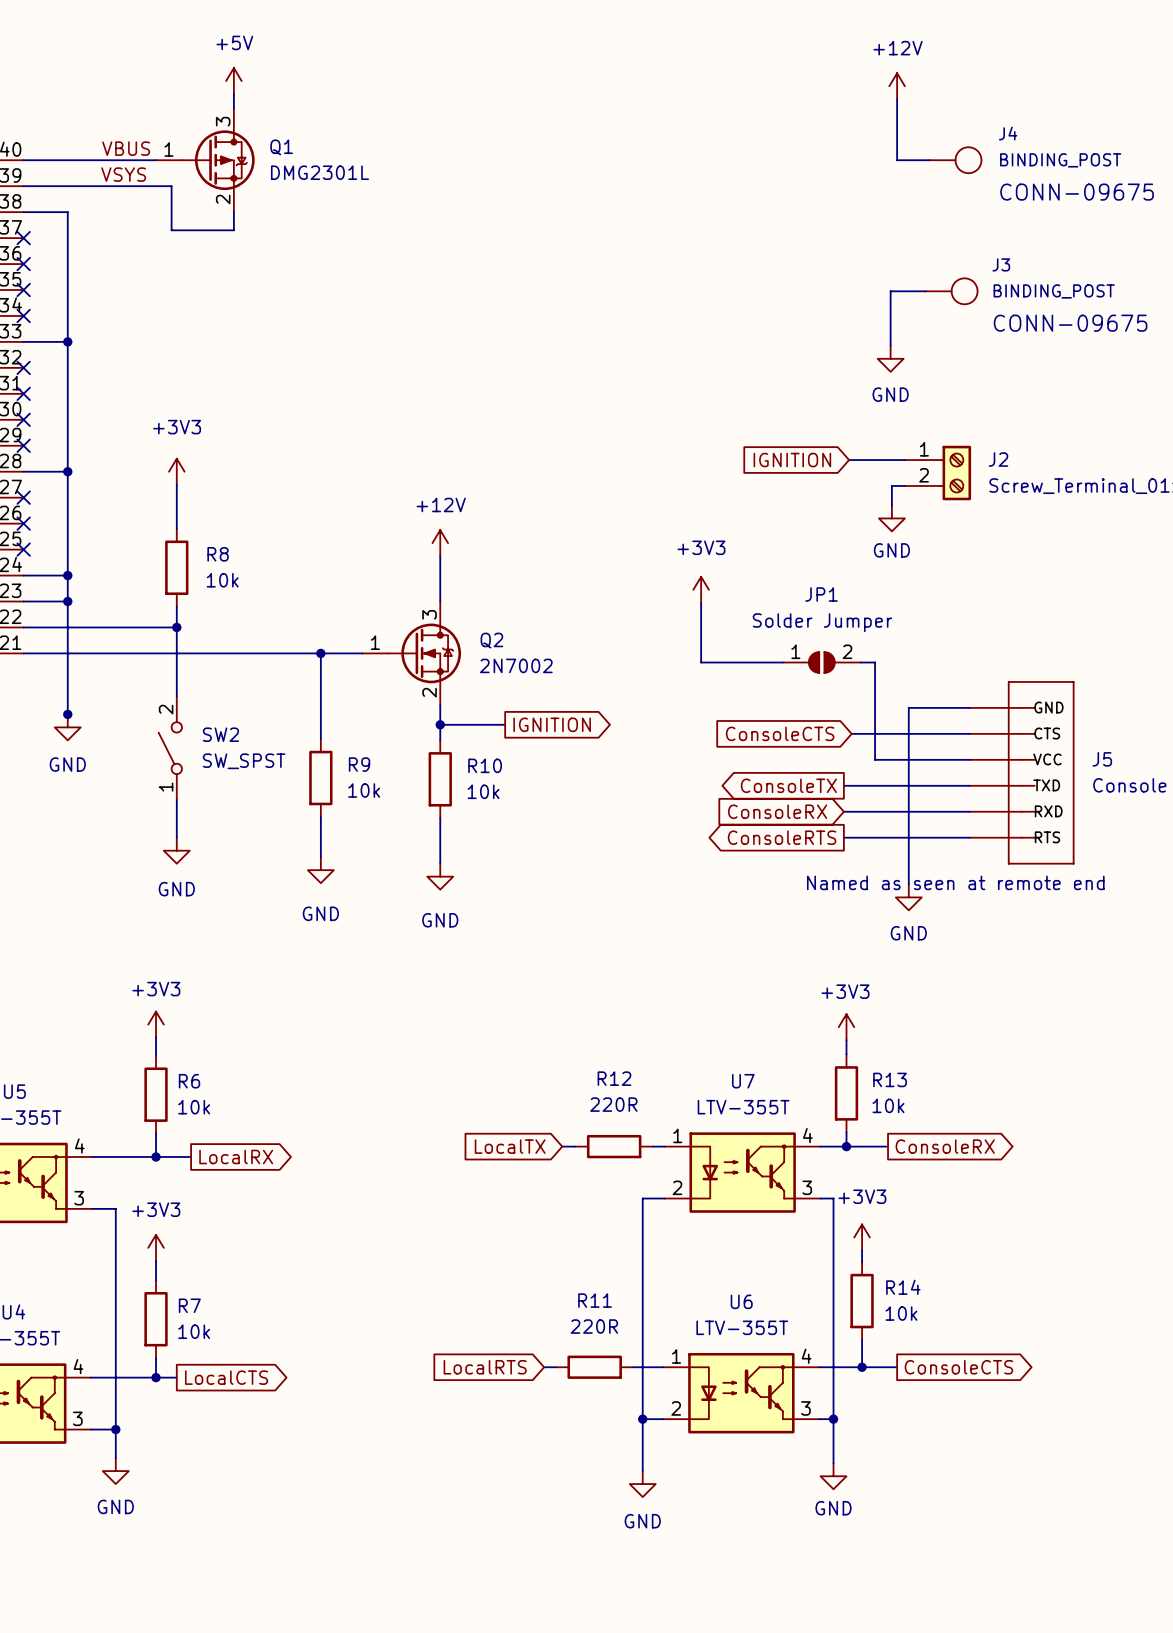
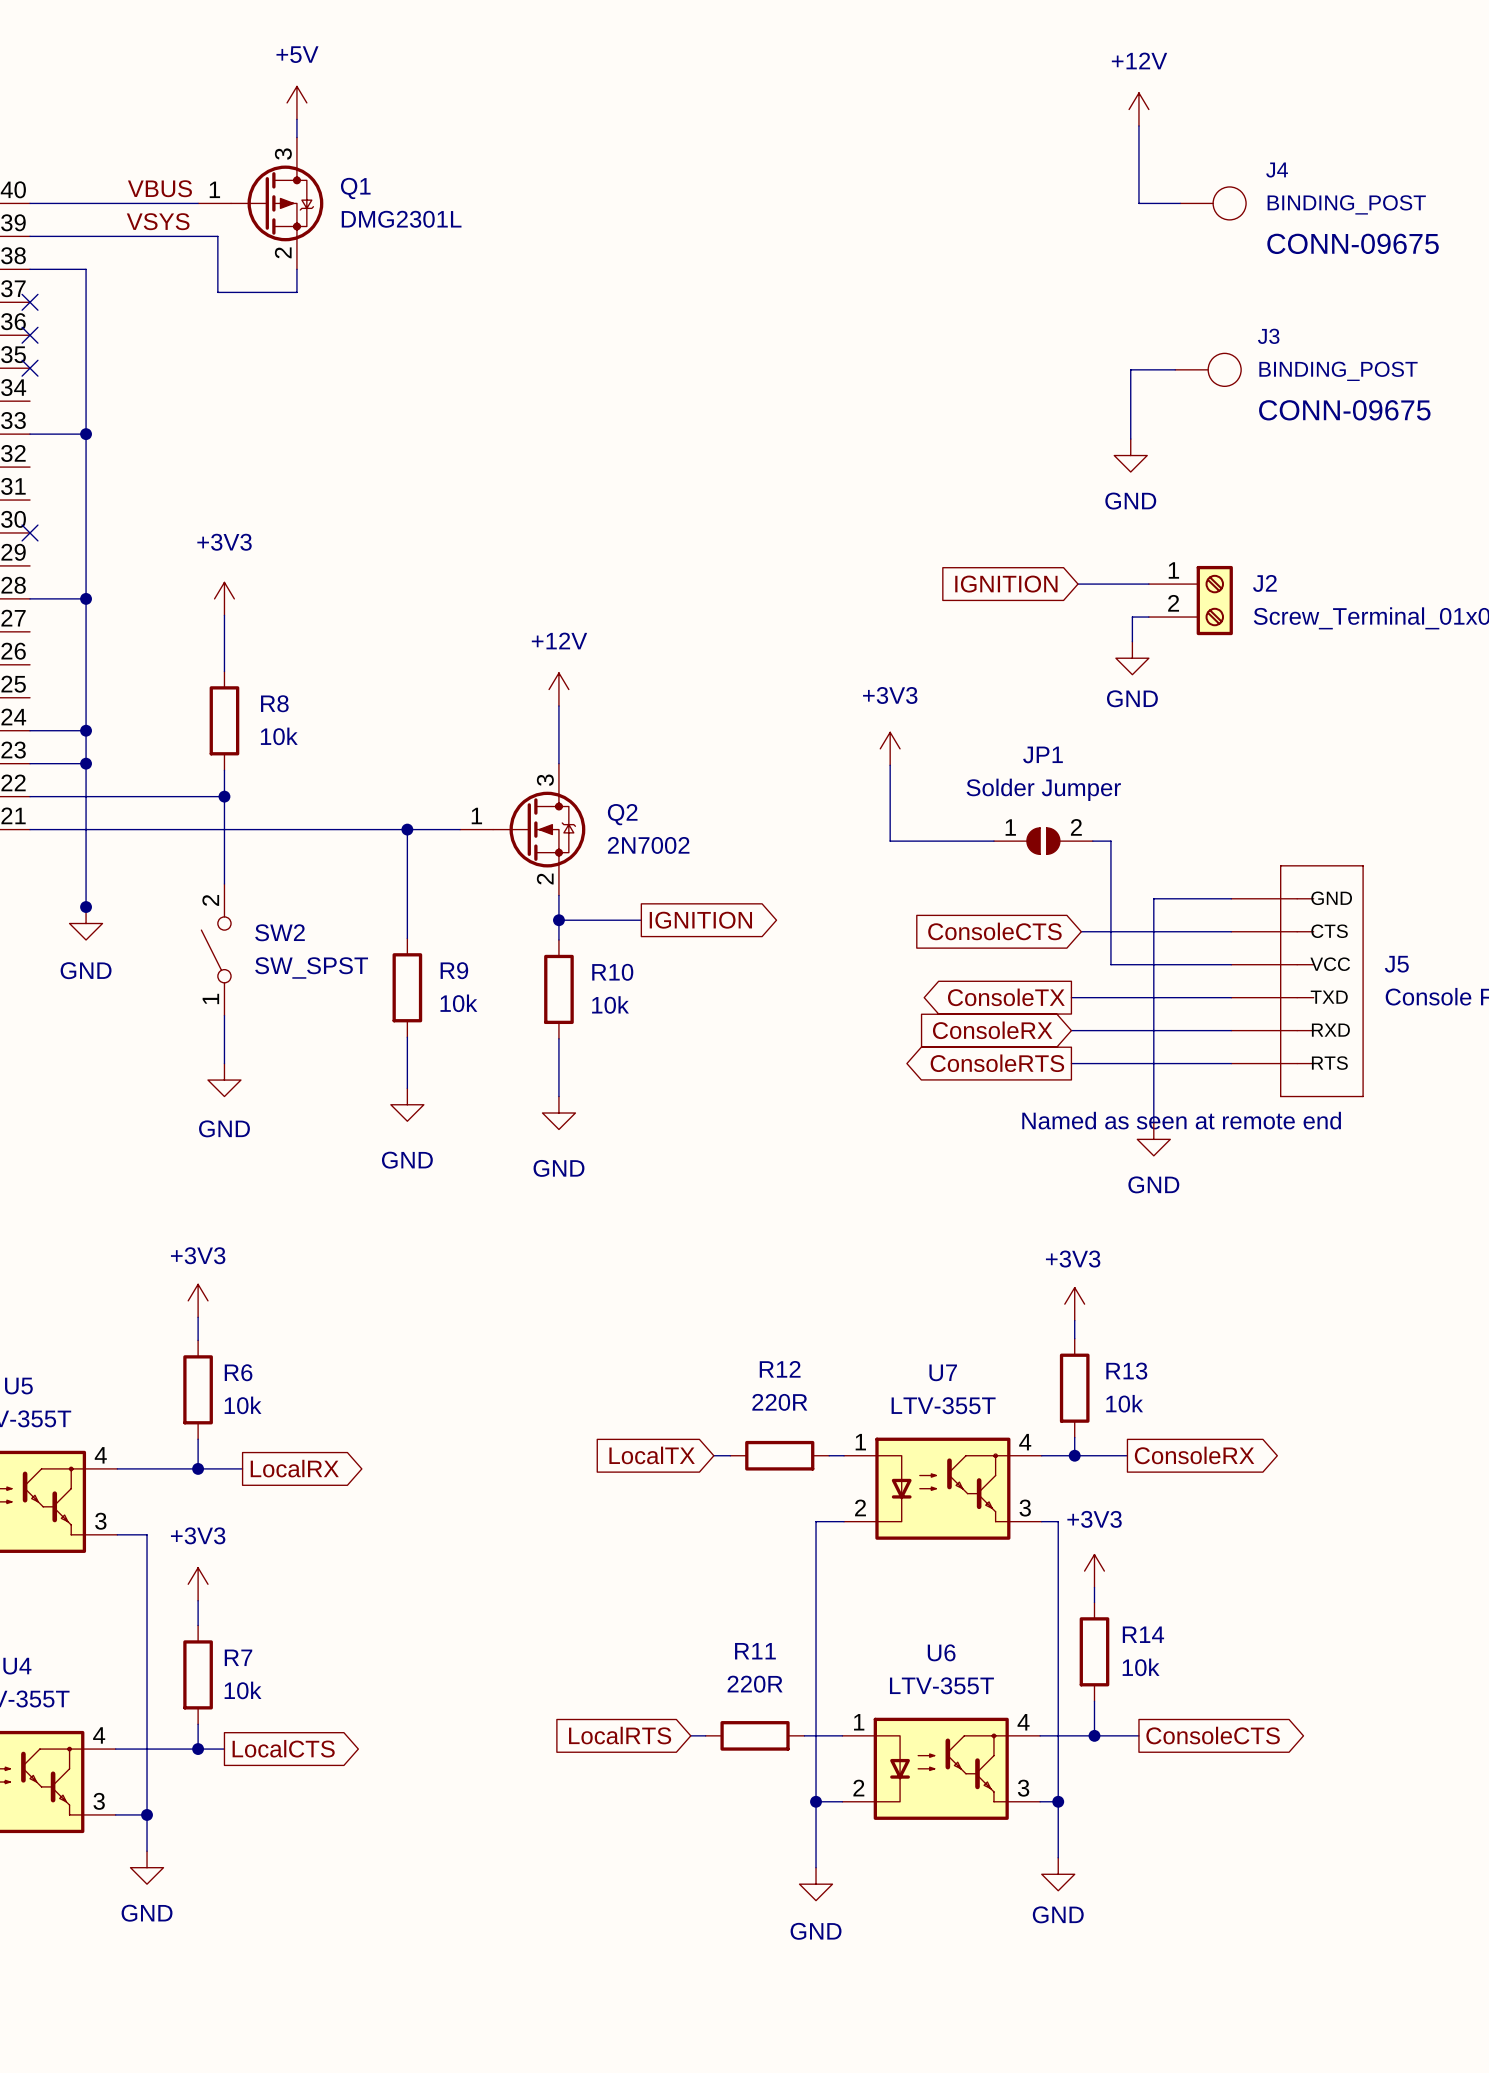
no-connect mark: (23, 315) -> none
no-connect mark: (23, 367) -> none
no-connect mark: (23, 393) -> none
no-connect mark: (23, 445) -> none
no-connect mark: (23, 497) -> none
no-connect mark: (23, 523) -> none
no-connect mark: (23, 549) -> none

